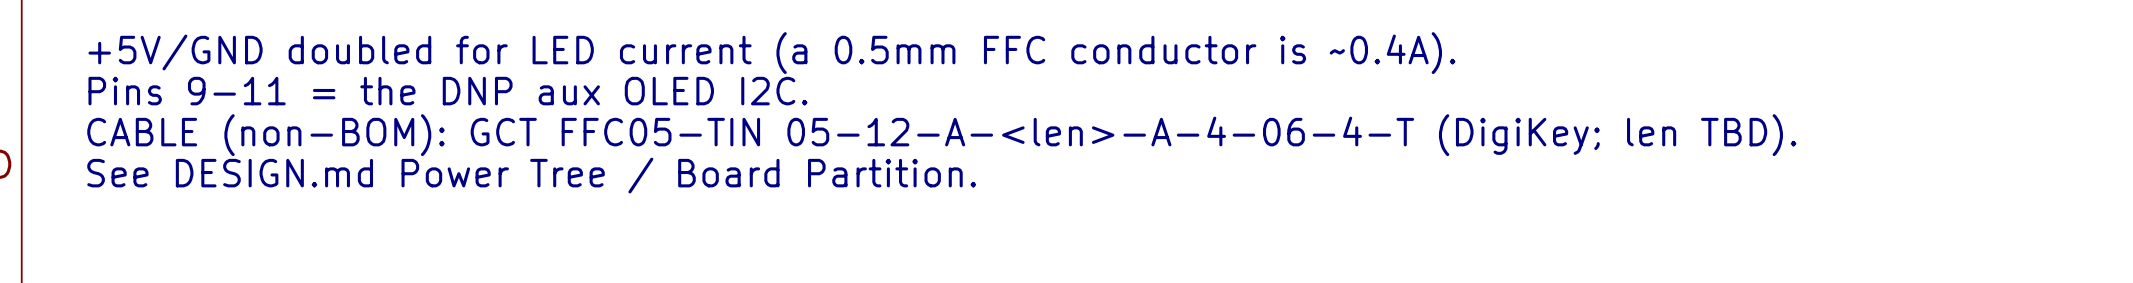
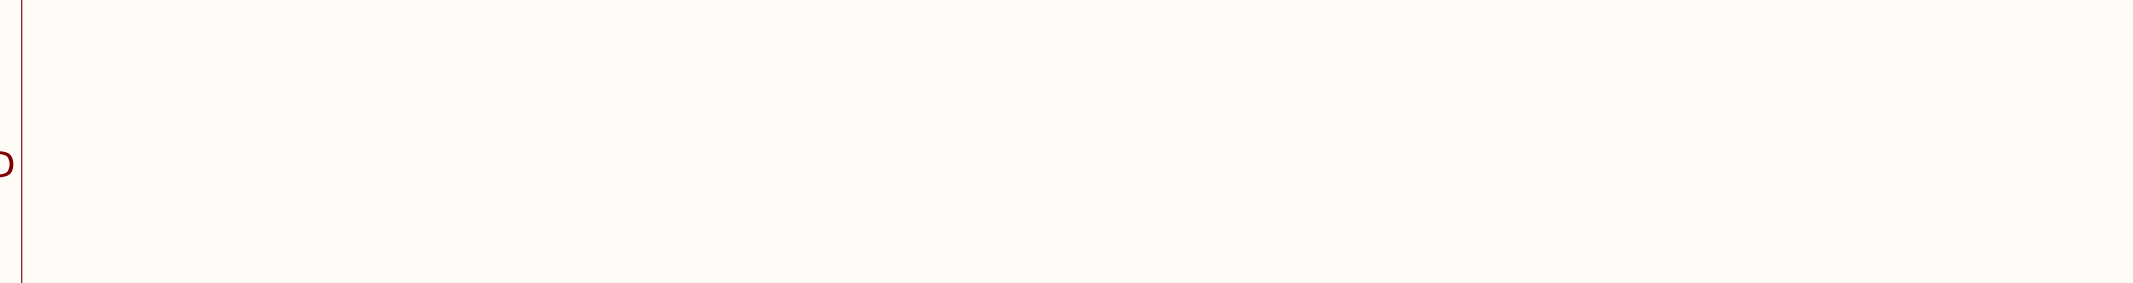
text: +5V/GND doubled for LED current (a 0.5mm FFC conductor is ~0.4A). (771, 53) -> none
text: Pins 9-11 = the DNP aux OLED I2C. (447, 91) -> none
text: CABLE (non-BOM): GCT FFC05-TIN 05-12-A-<len>-A-4-06-4-T (DigiKey; len TBD). (941, 135) -> none
text: See DESIGN.md Power Tree / Board Partition. (531, 175) -> none

